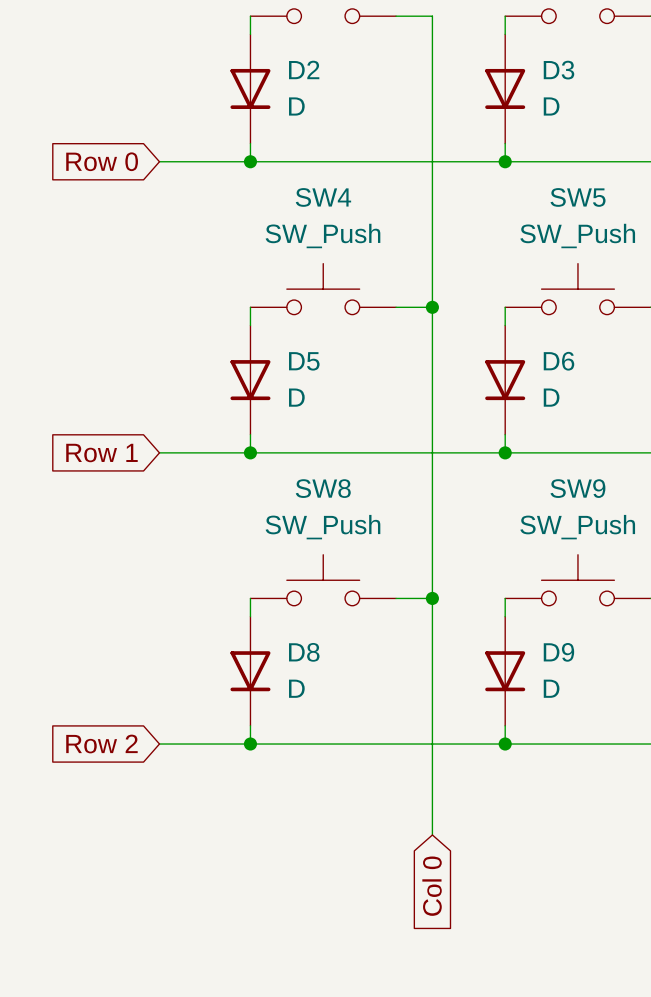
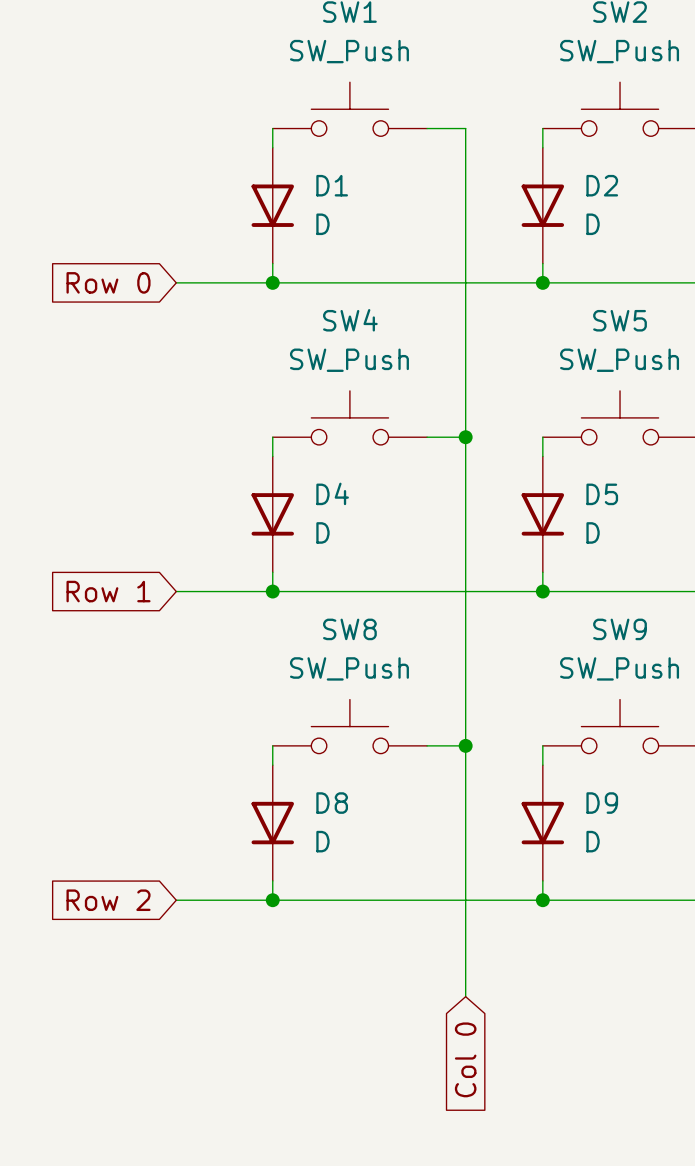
D2 name: D2 (304, 69) -> D1 (332, 185)
D3 name: D3 (558, 70) -> D2 (602, 185)
D5 name: D5 (304, 361) -> D4 (332, 493)
D6 name: D6 (558, 361) -> D5 (602, 494)

